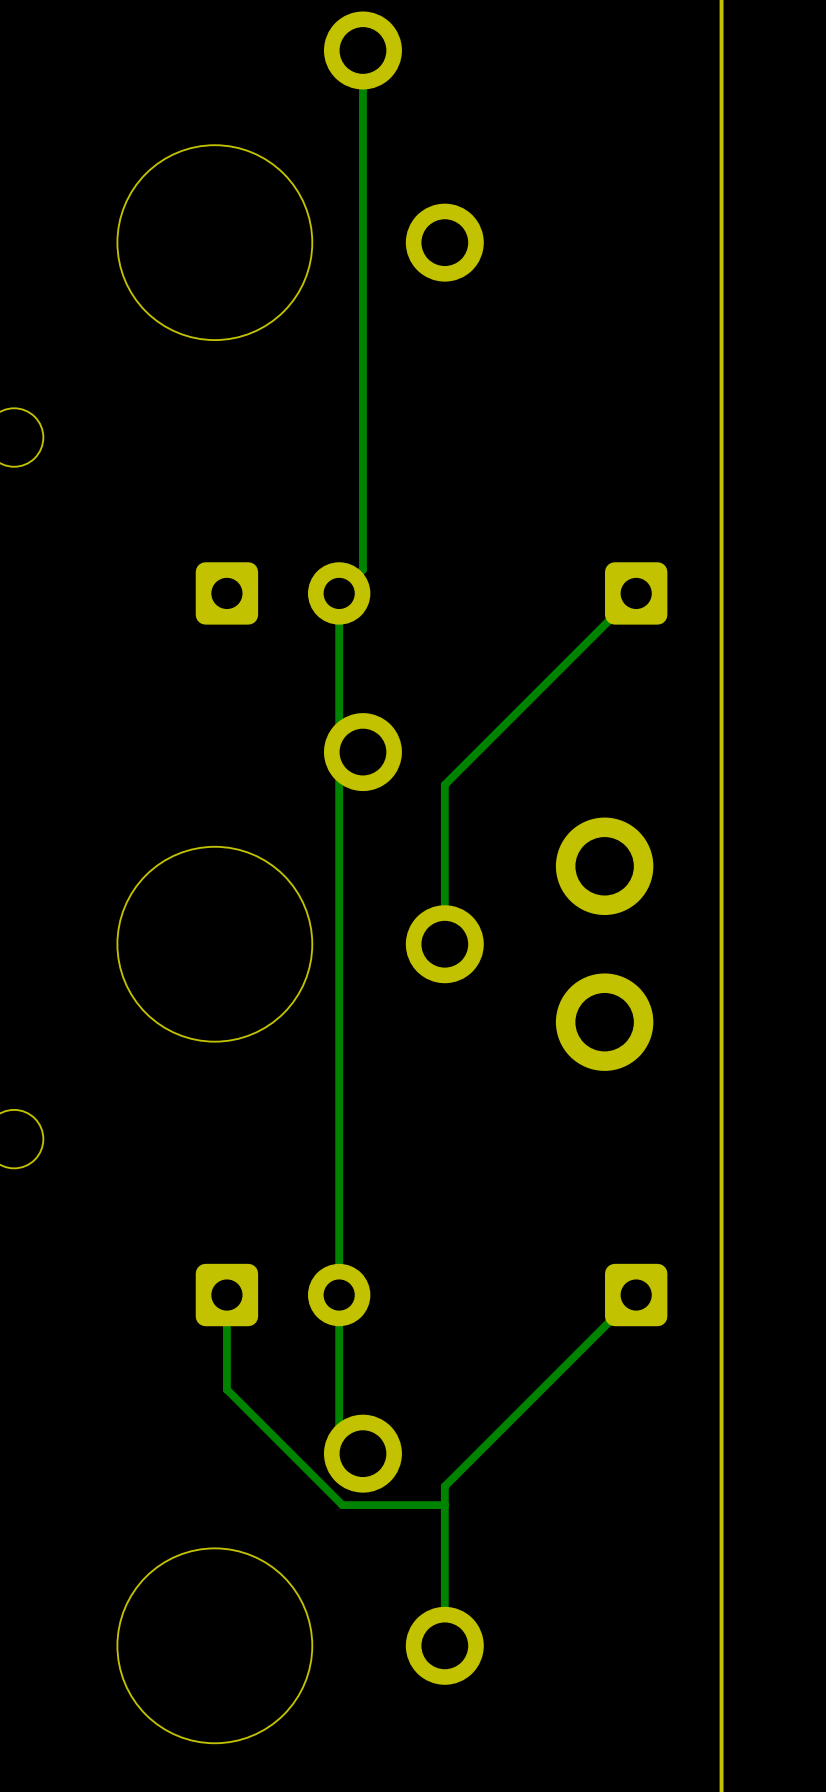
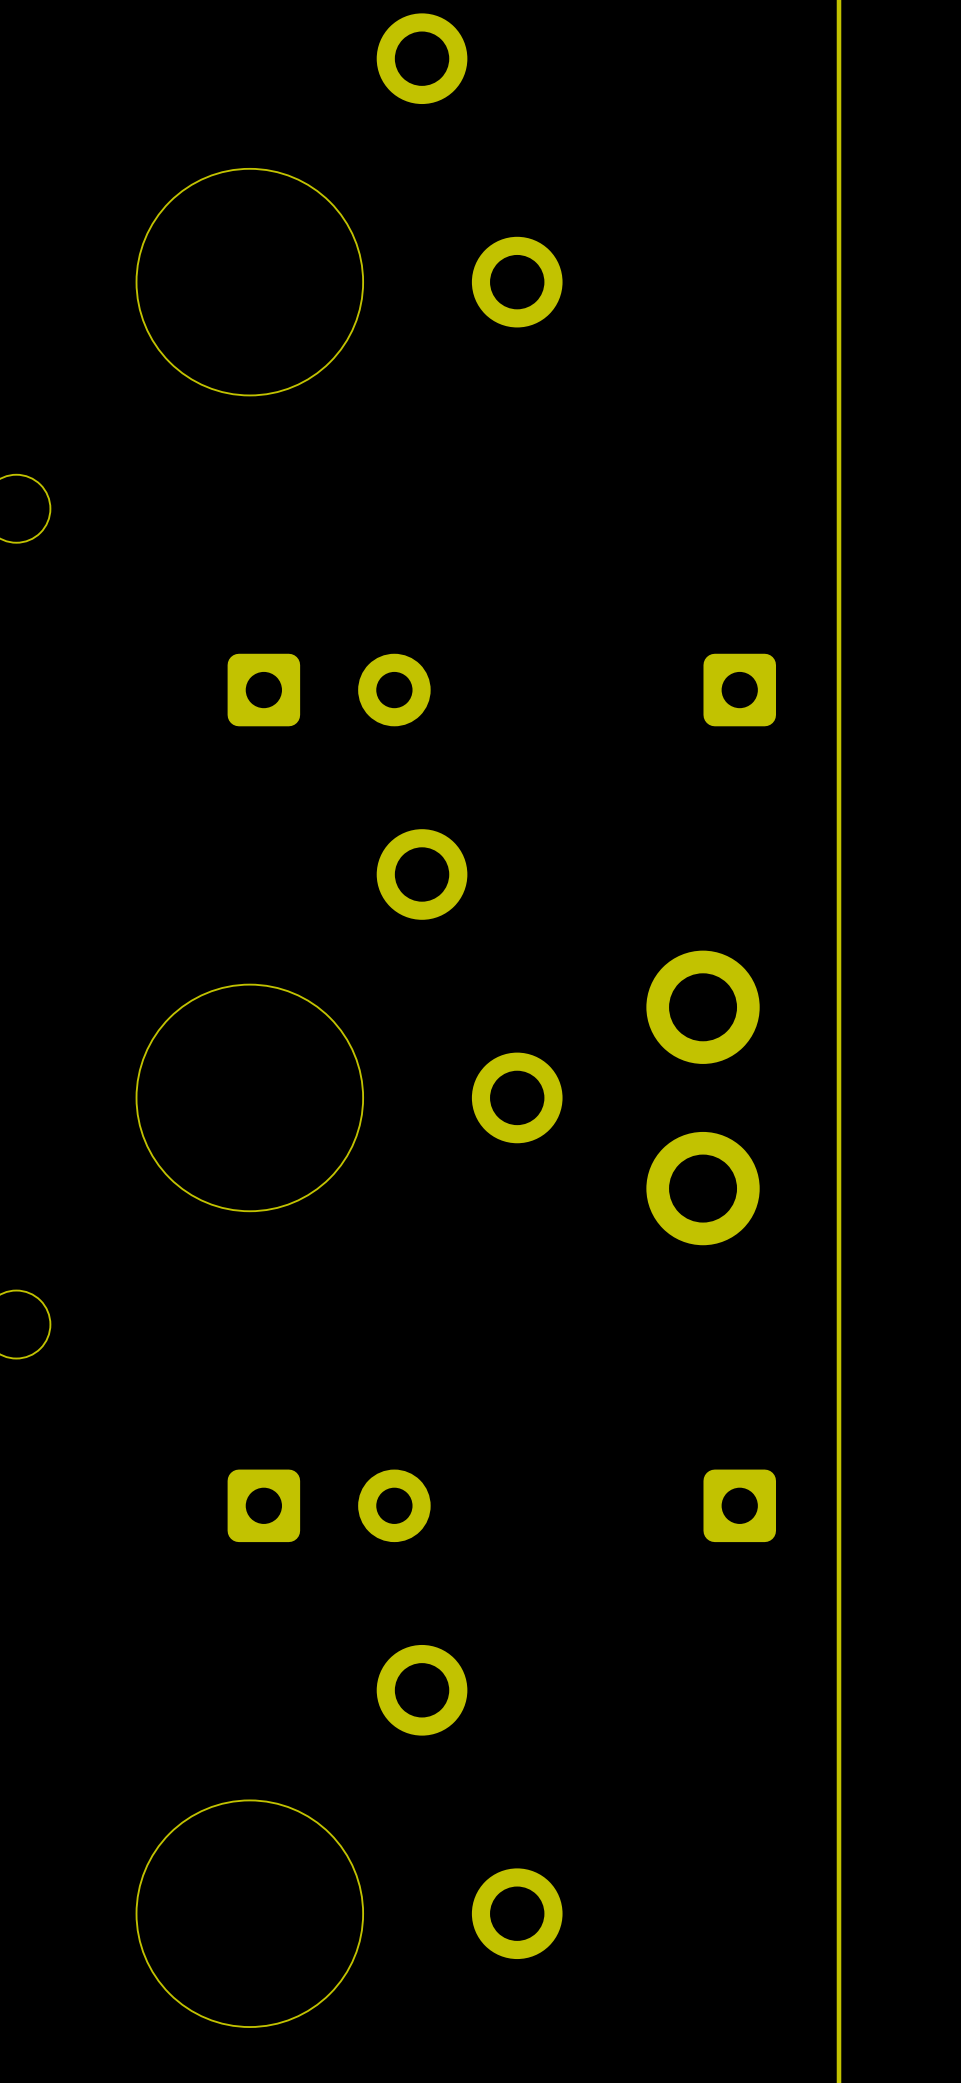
track: (362, 50) (362, 569) (339, 593) (339, 728) (362, 752) (339, 775) (339, 1429) (362, 1453) -> none
track: (636, 593) (444, 784) (444, 944) -> none
track: (226, 1295) (226, 1389) (342, 1505) (444, 1505) -> none
track: (636, 1295) (444, 1486) (444, 1645) -> none

